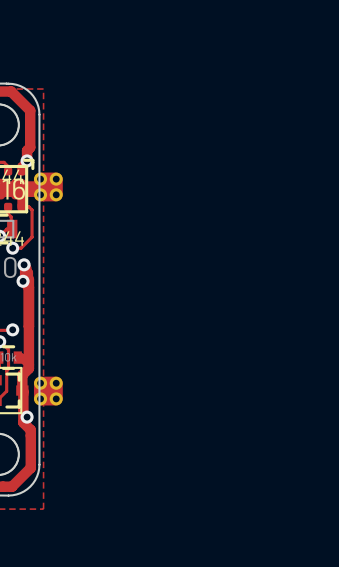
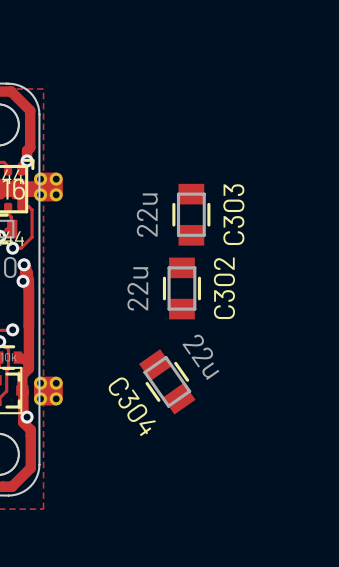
C303: none -> 22u (191, 214)
C302: none -> 22u (181, 288)
C304: none -> 22u (167, 381)

